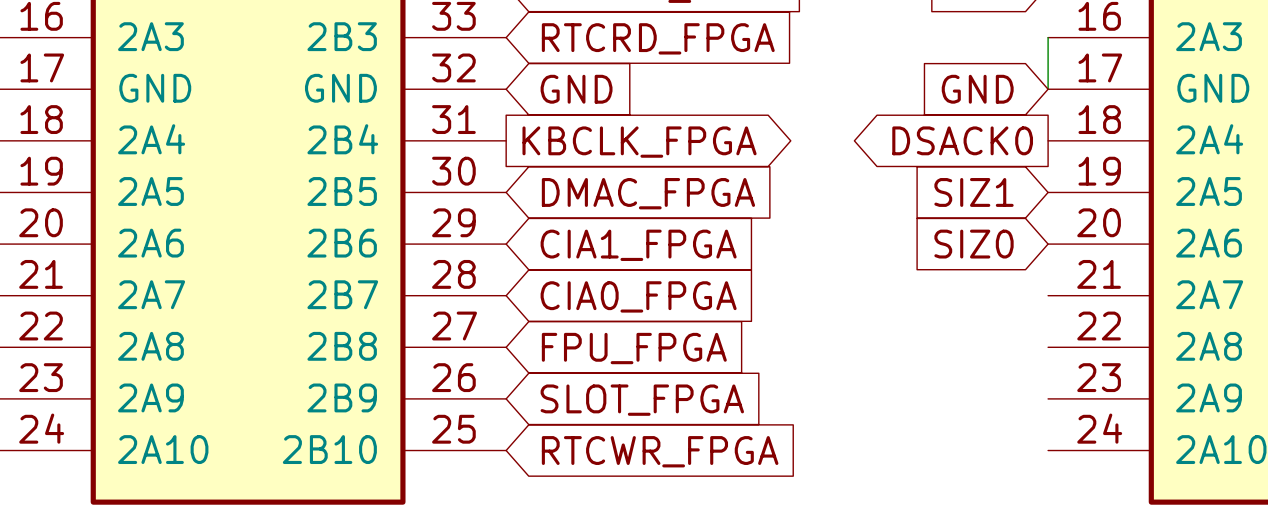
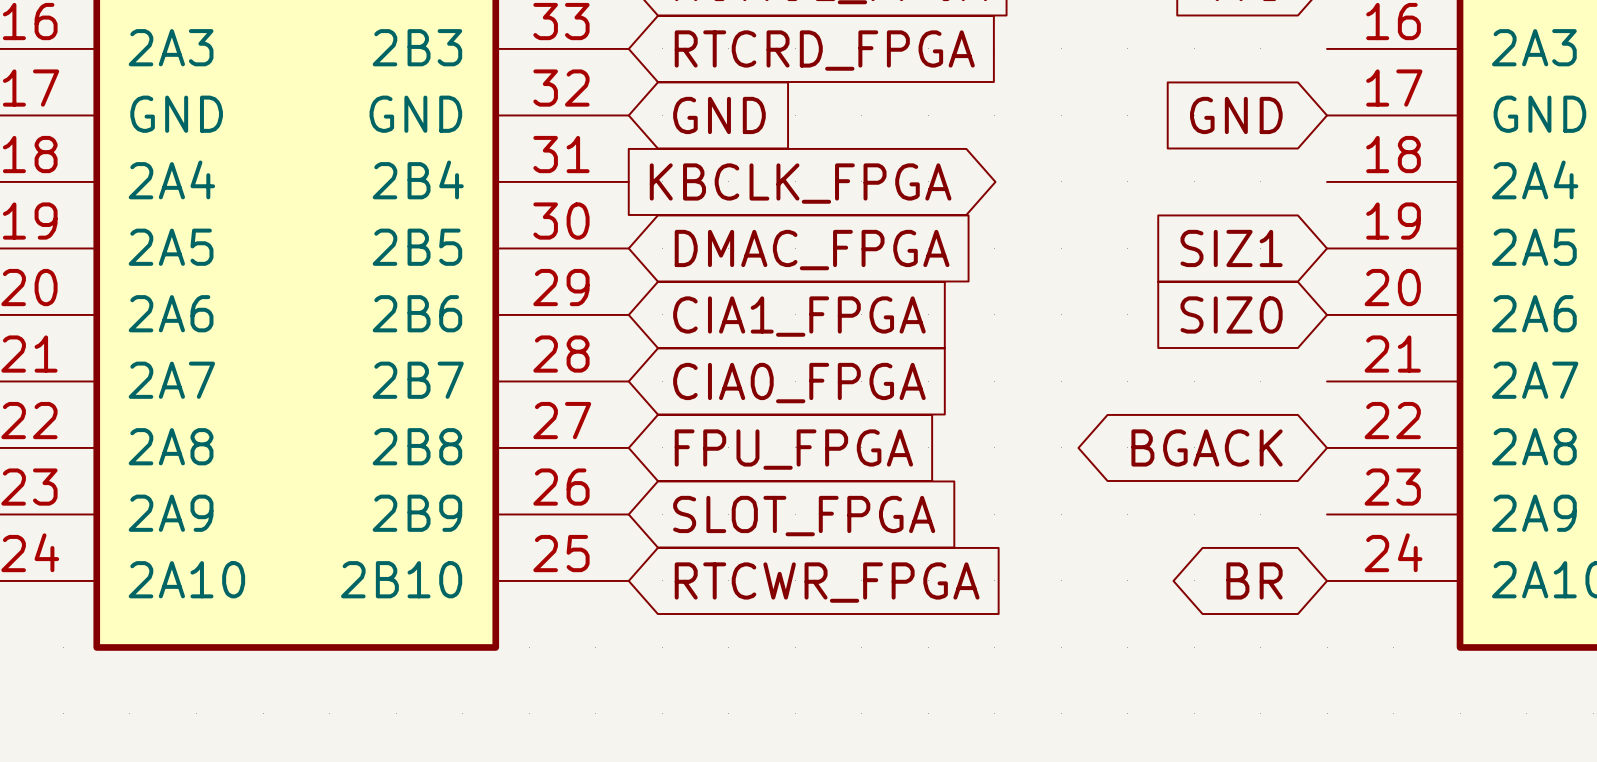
wire: (1048, 37) (1048, 89) -> none
global label: DSACK0 (962, 140) -> none
global label: none -> BGACK (1207, 447)
global label: none -> BR (1254, 580)

